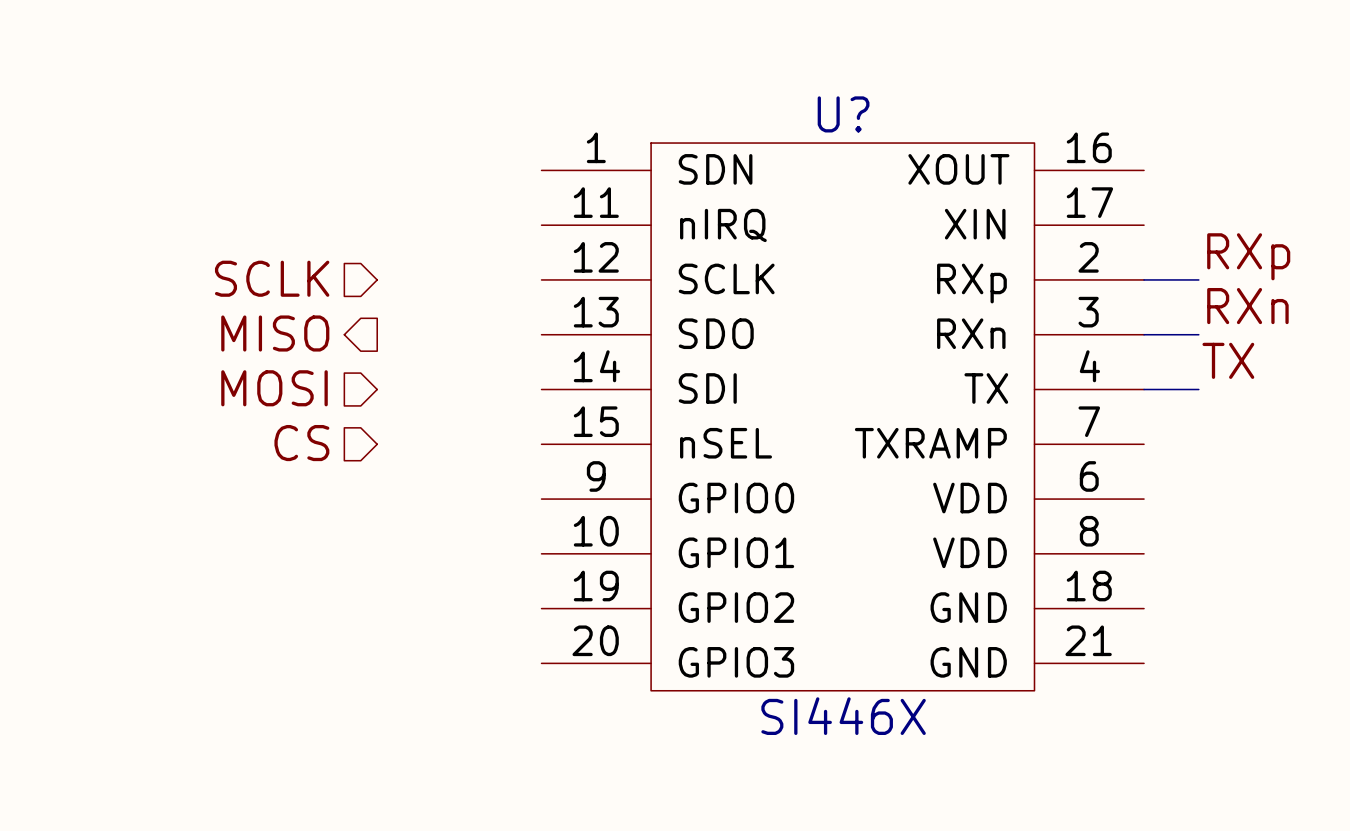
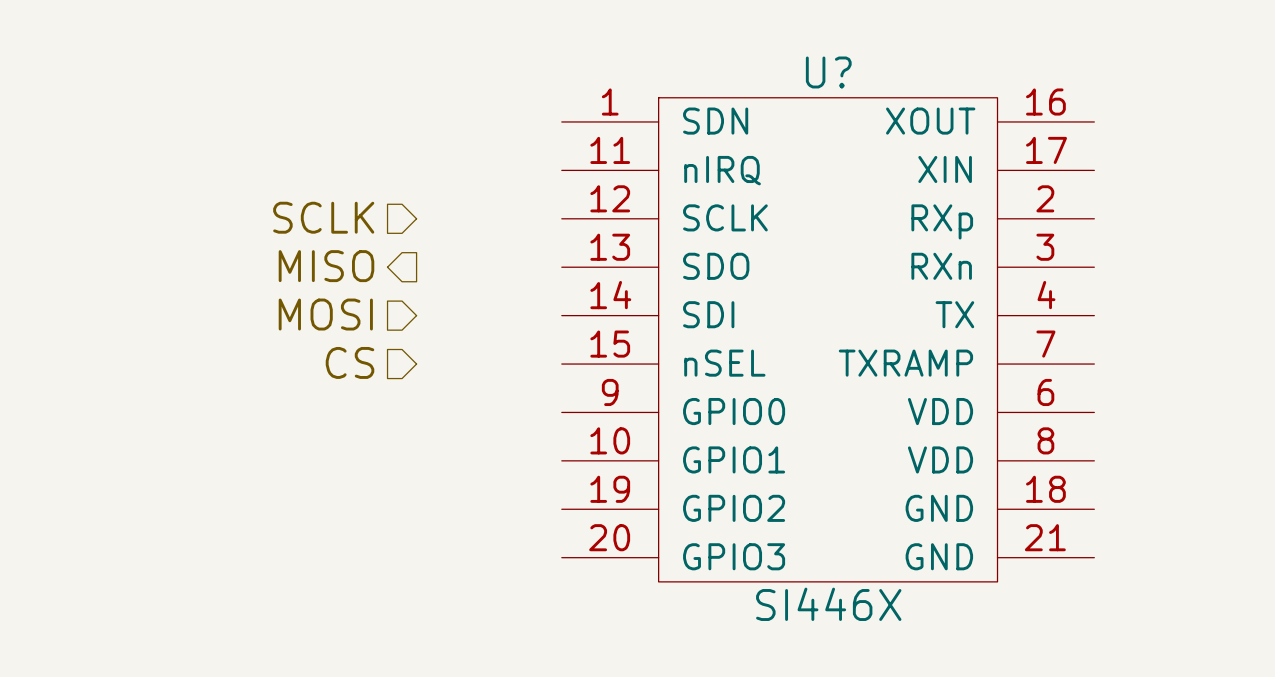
label: RXp (1248, 256) -> none
wire: (1144, 279) (1198, 279) -> none
label: RXn (1247, 306) -> none
wire: (1144, 334) (1198, 334) -> none
label: TX (1228, 360) -> none
wire: (1144, 389) (1198, 389) -> none

